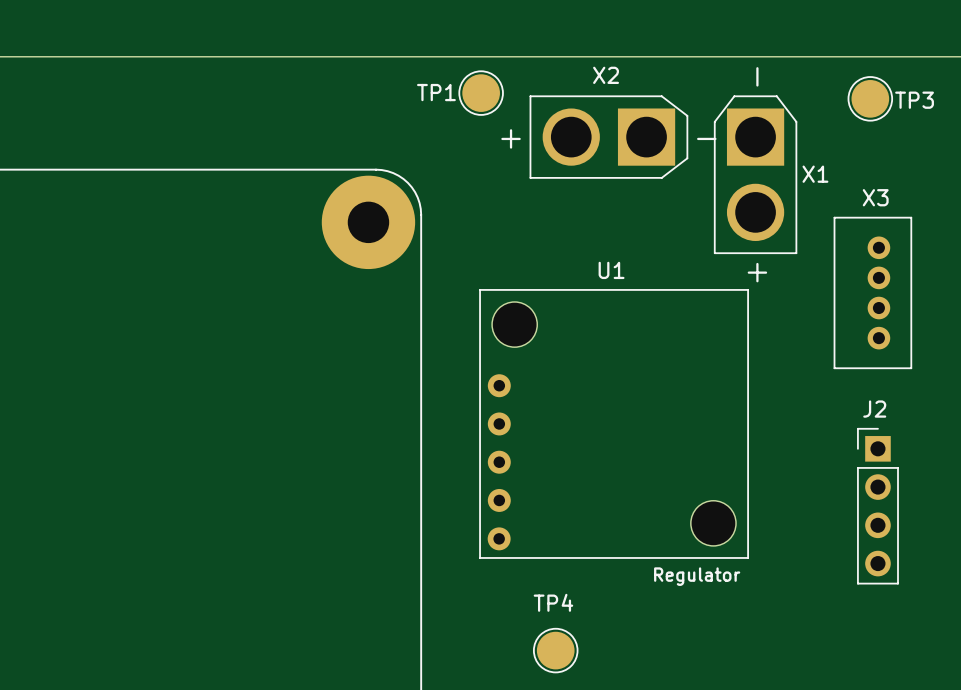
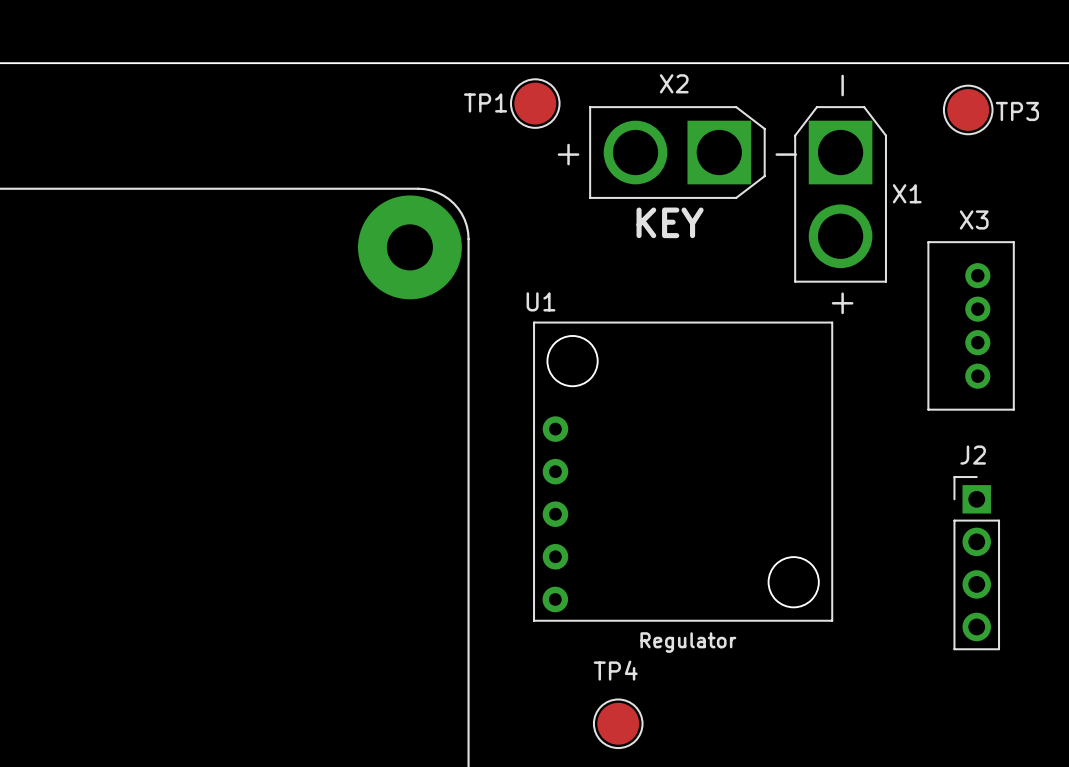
text: none -> KEY (670, 222)
U1 name position: U1 (611, 270) -> U1 (540, 301)
text position: Regulator (697, 576) -> Regulator (688, 642)

